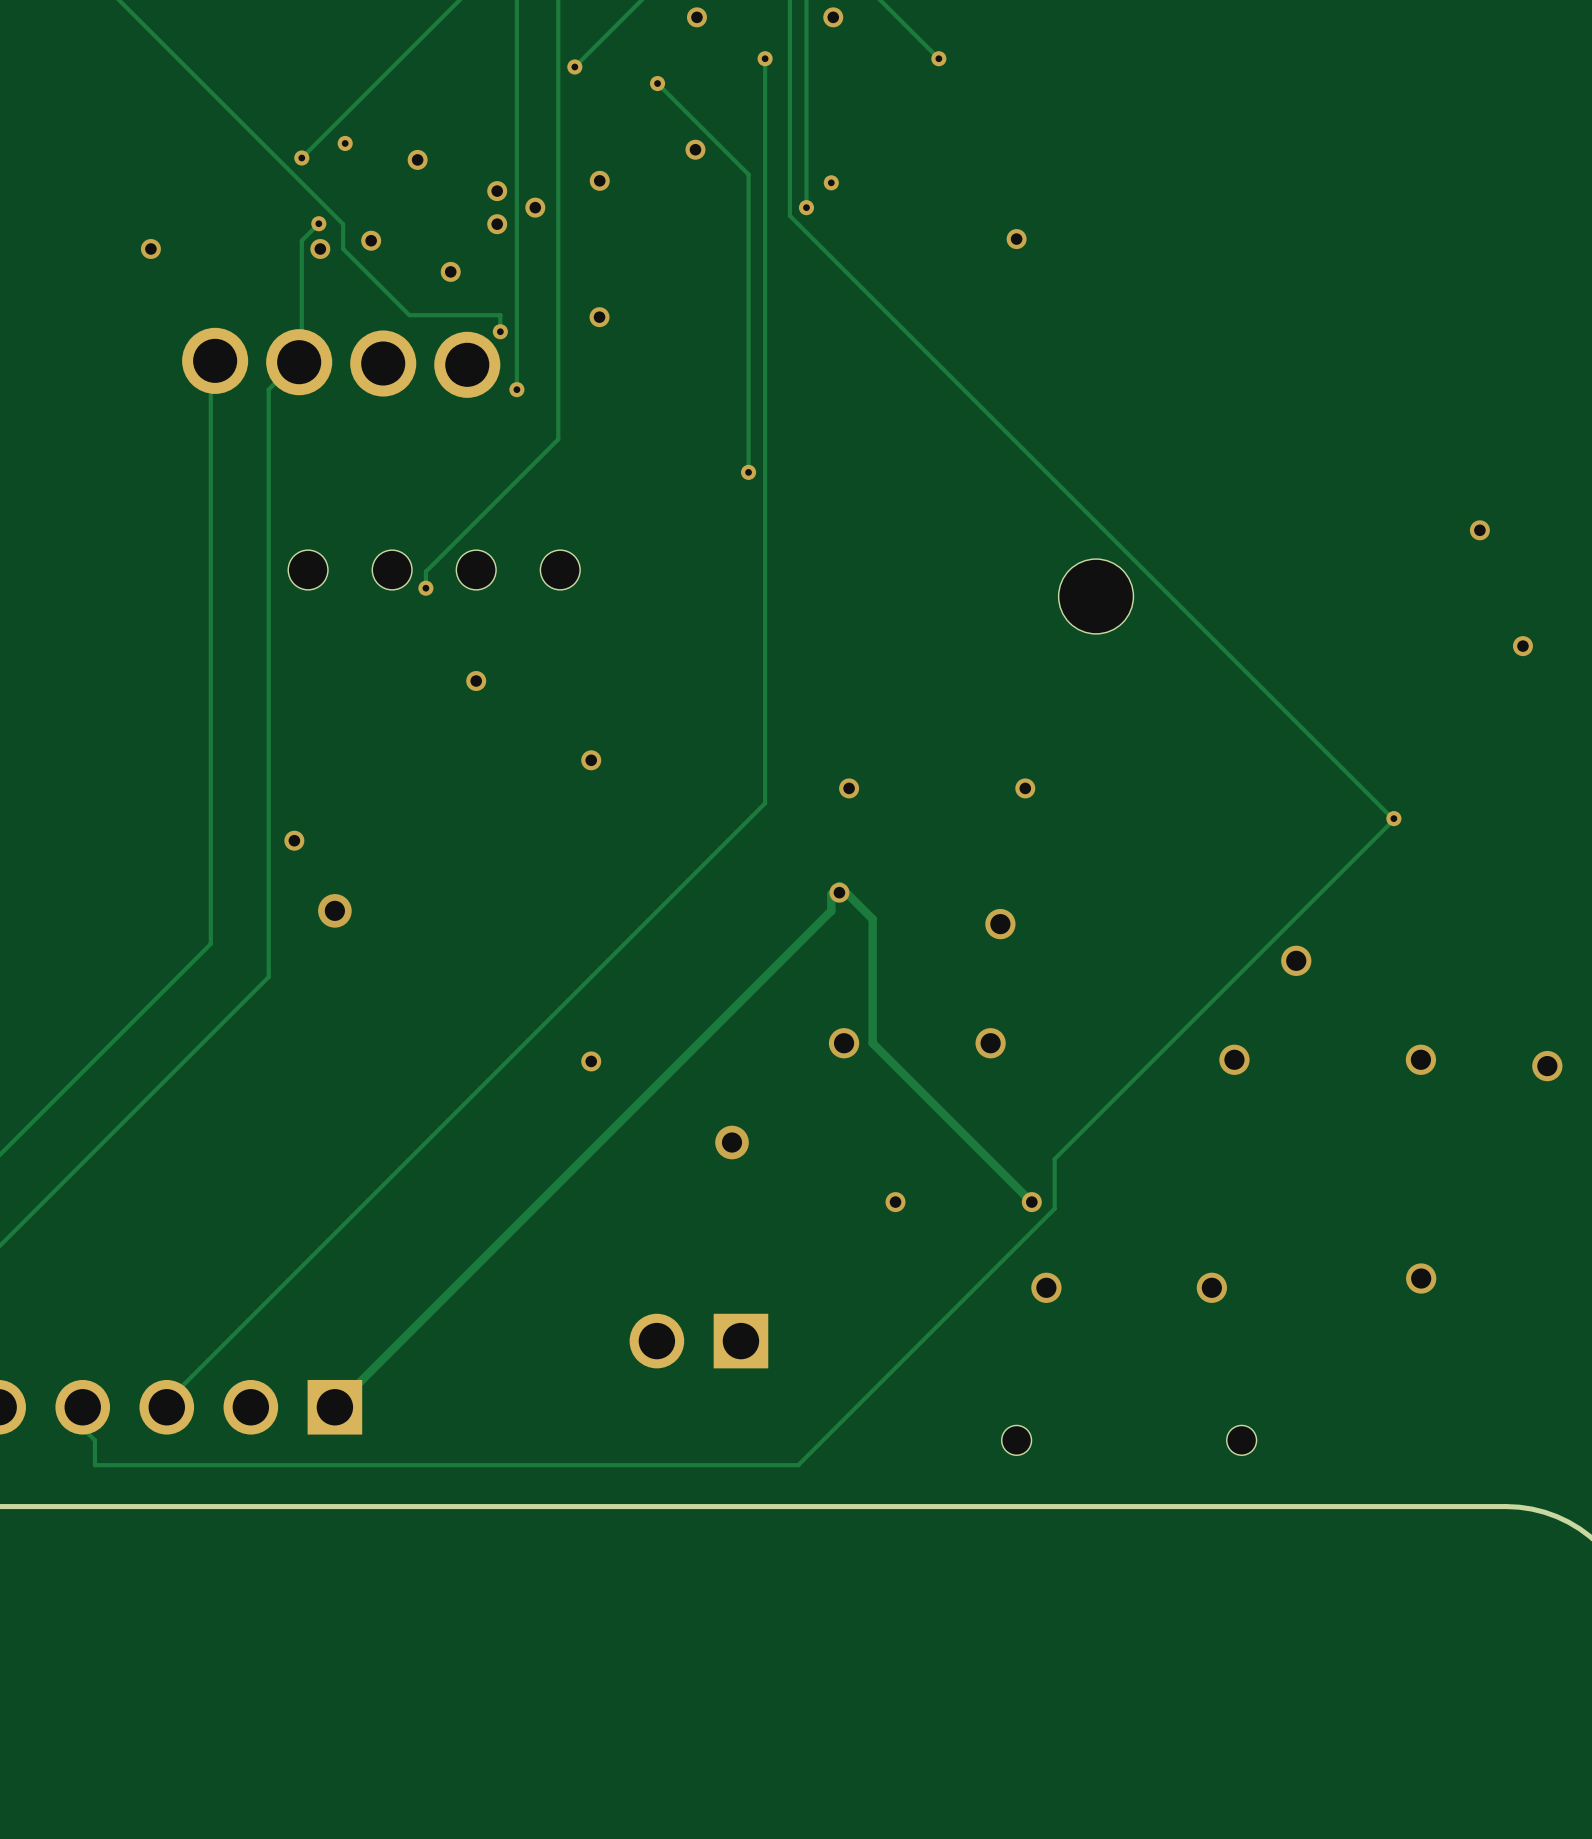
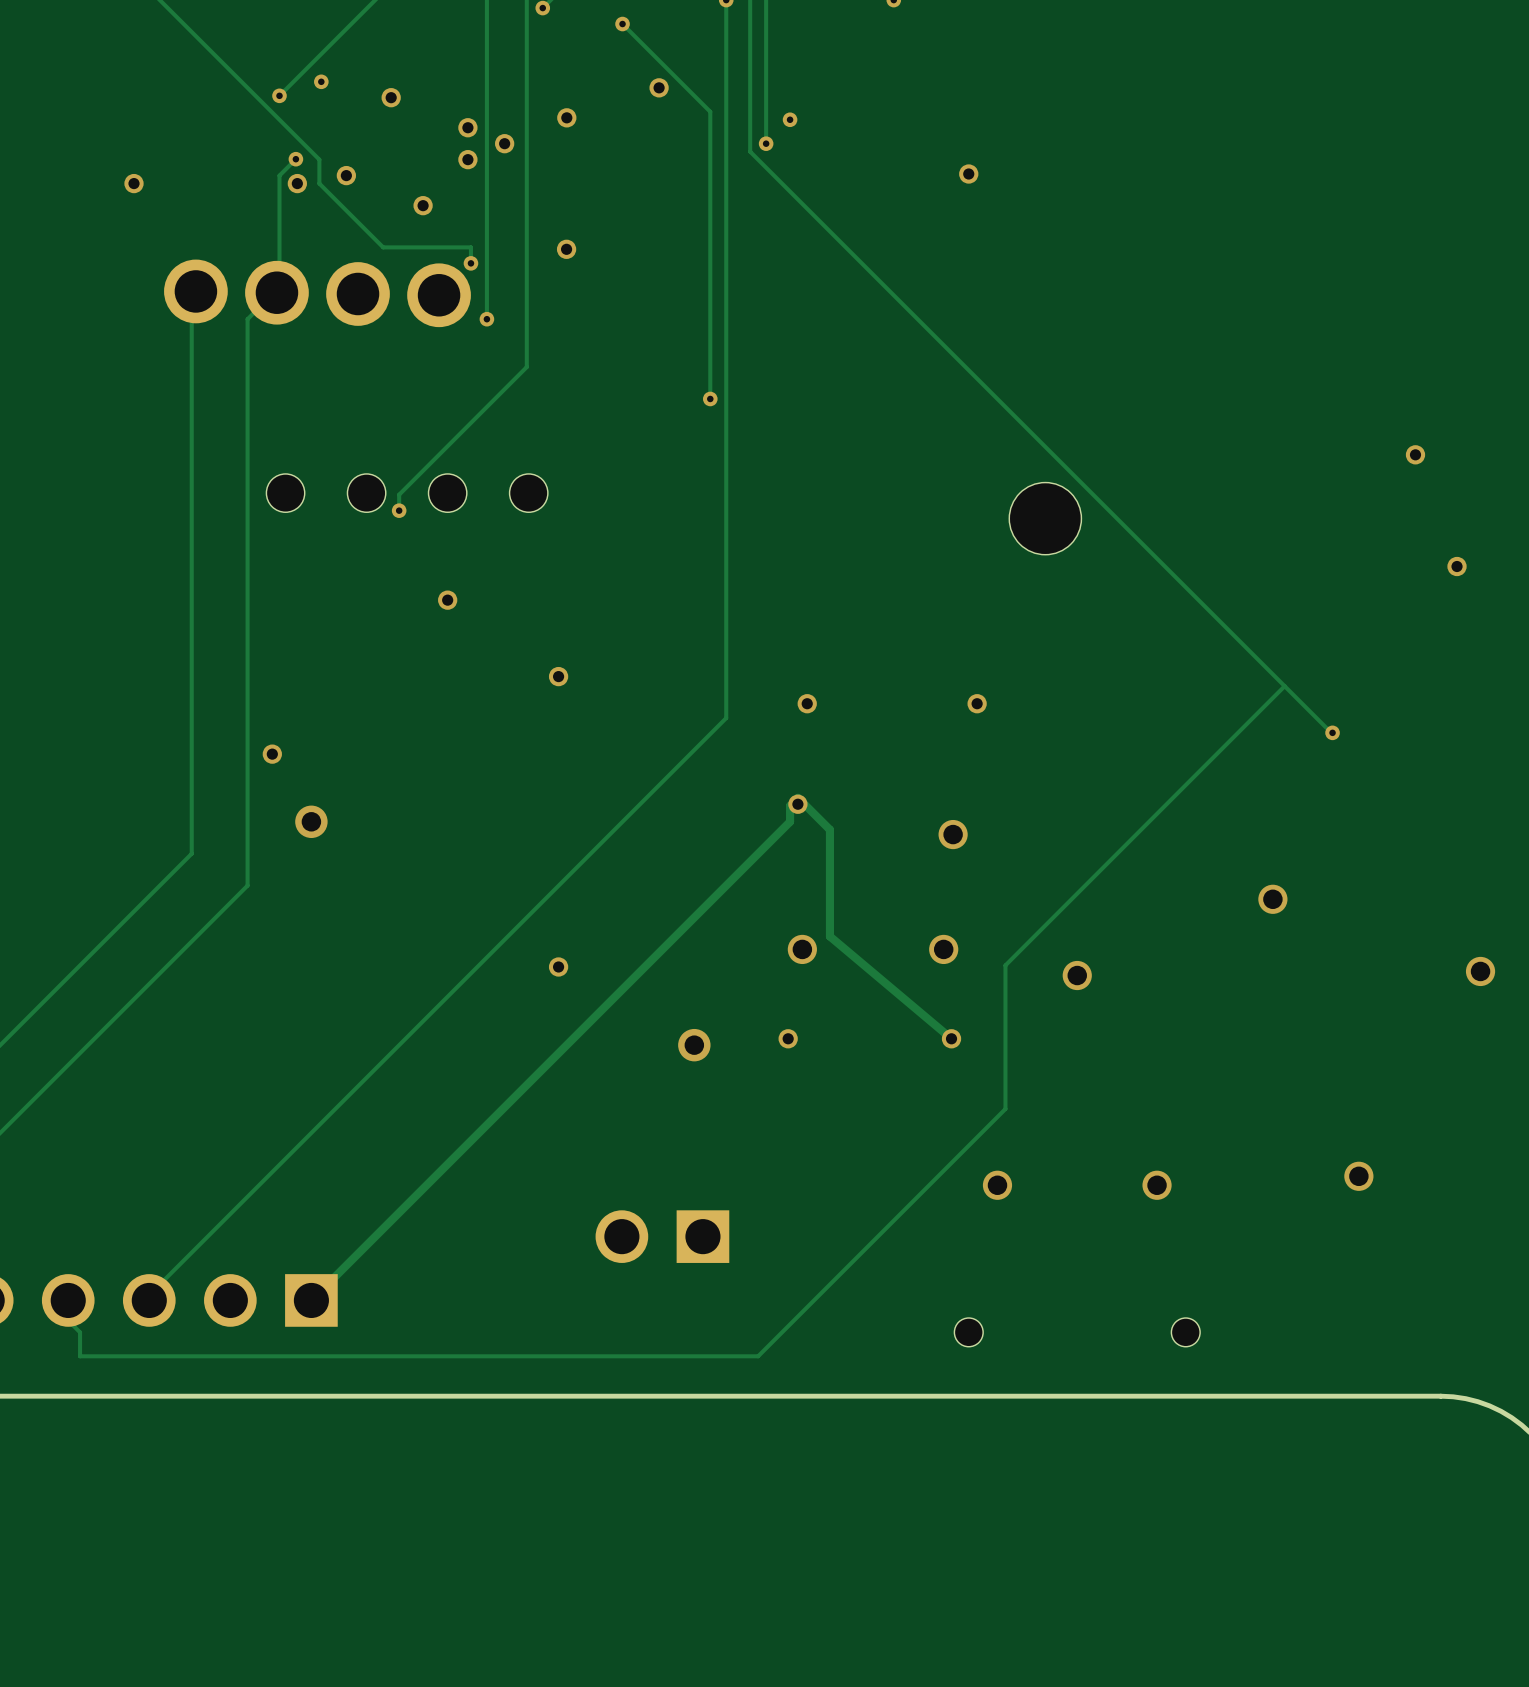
track: (1393, 819) (1054, 1159) -> (1284, 686) (1005, 965) (1005, 1061)
via position: (1296, 960) -> (1272, 899)
track: (872, 1029) (872, 1043) (1031, 1202) -> (829, 936) (951, 1038)
via: (1234, 1059) -> none
via: (1420, 1059) -> none
via: none -> (1077, 975)
via: none -> (788, 1038)
via: none -> (951, 1038)
via: (895, 1202) -> none
via: (1031, 1202) -> none

